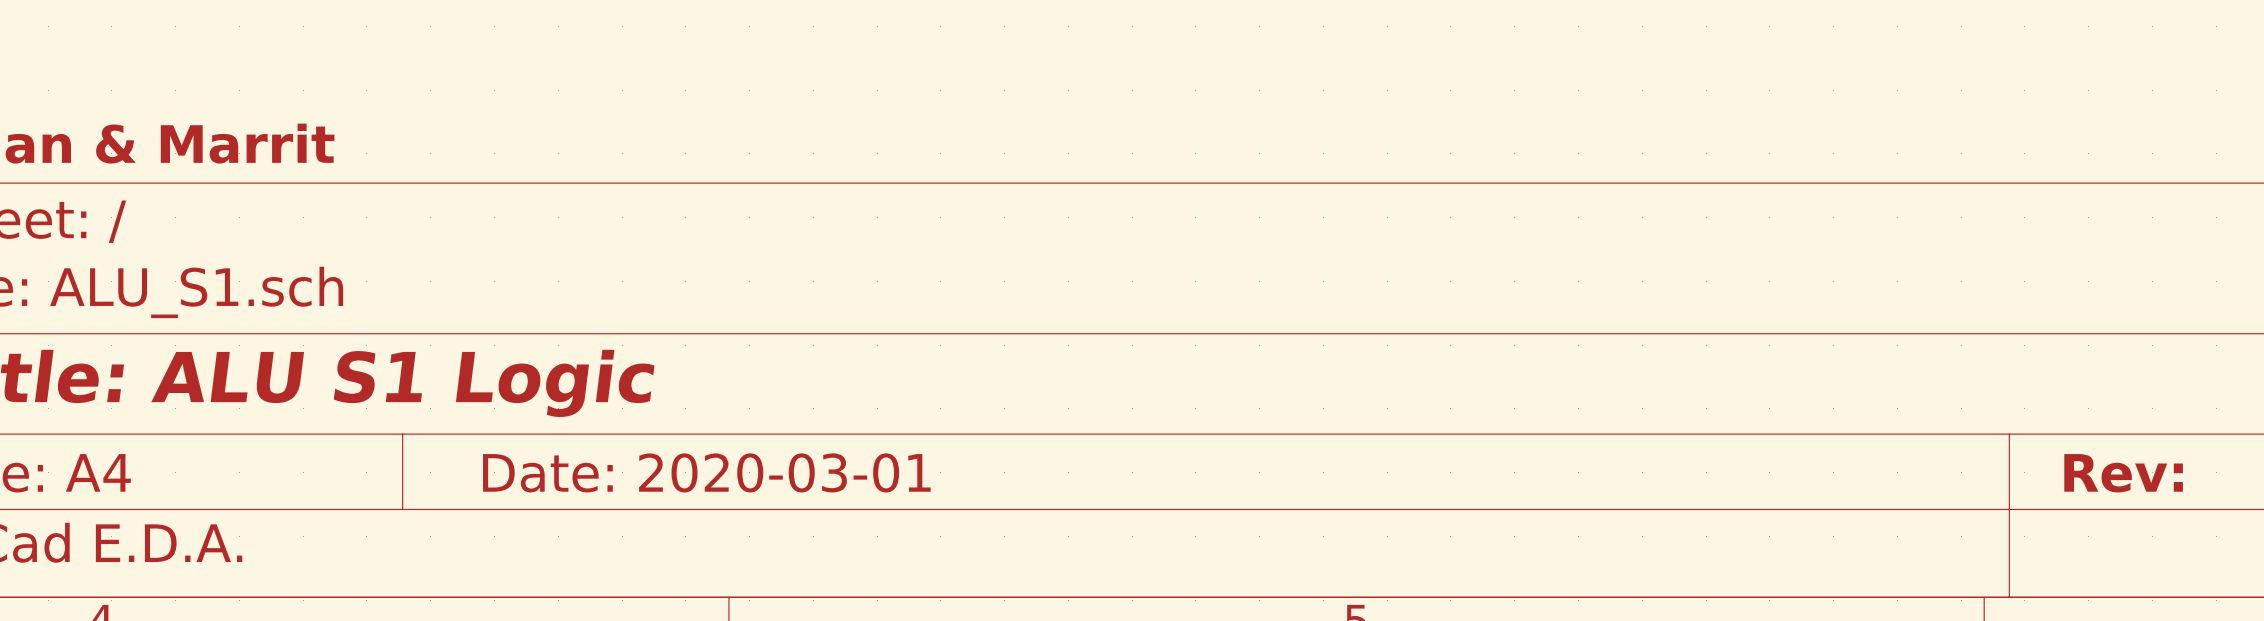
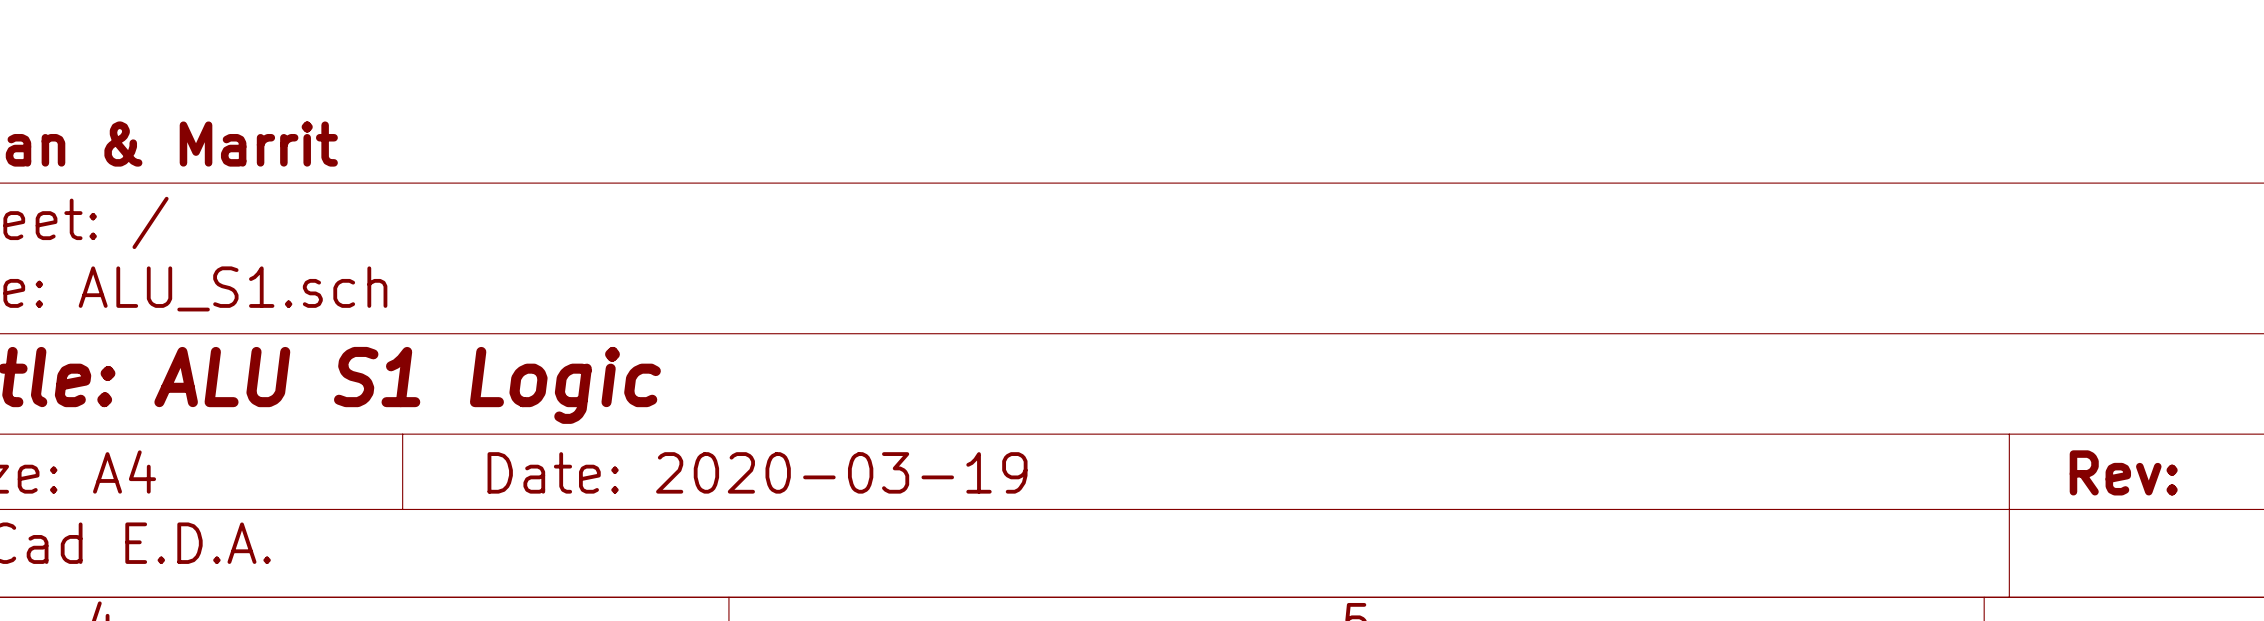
title block: Date: 2020-03-01 (706, 472) -> Date: 2020-03-19 (757, 472)

